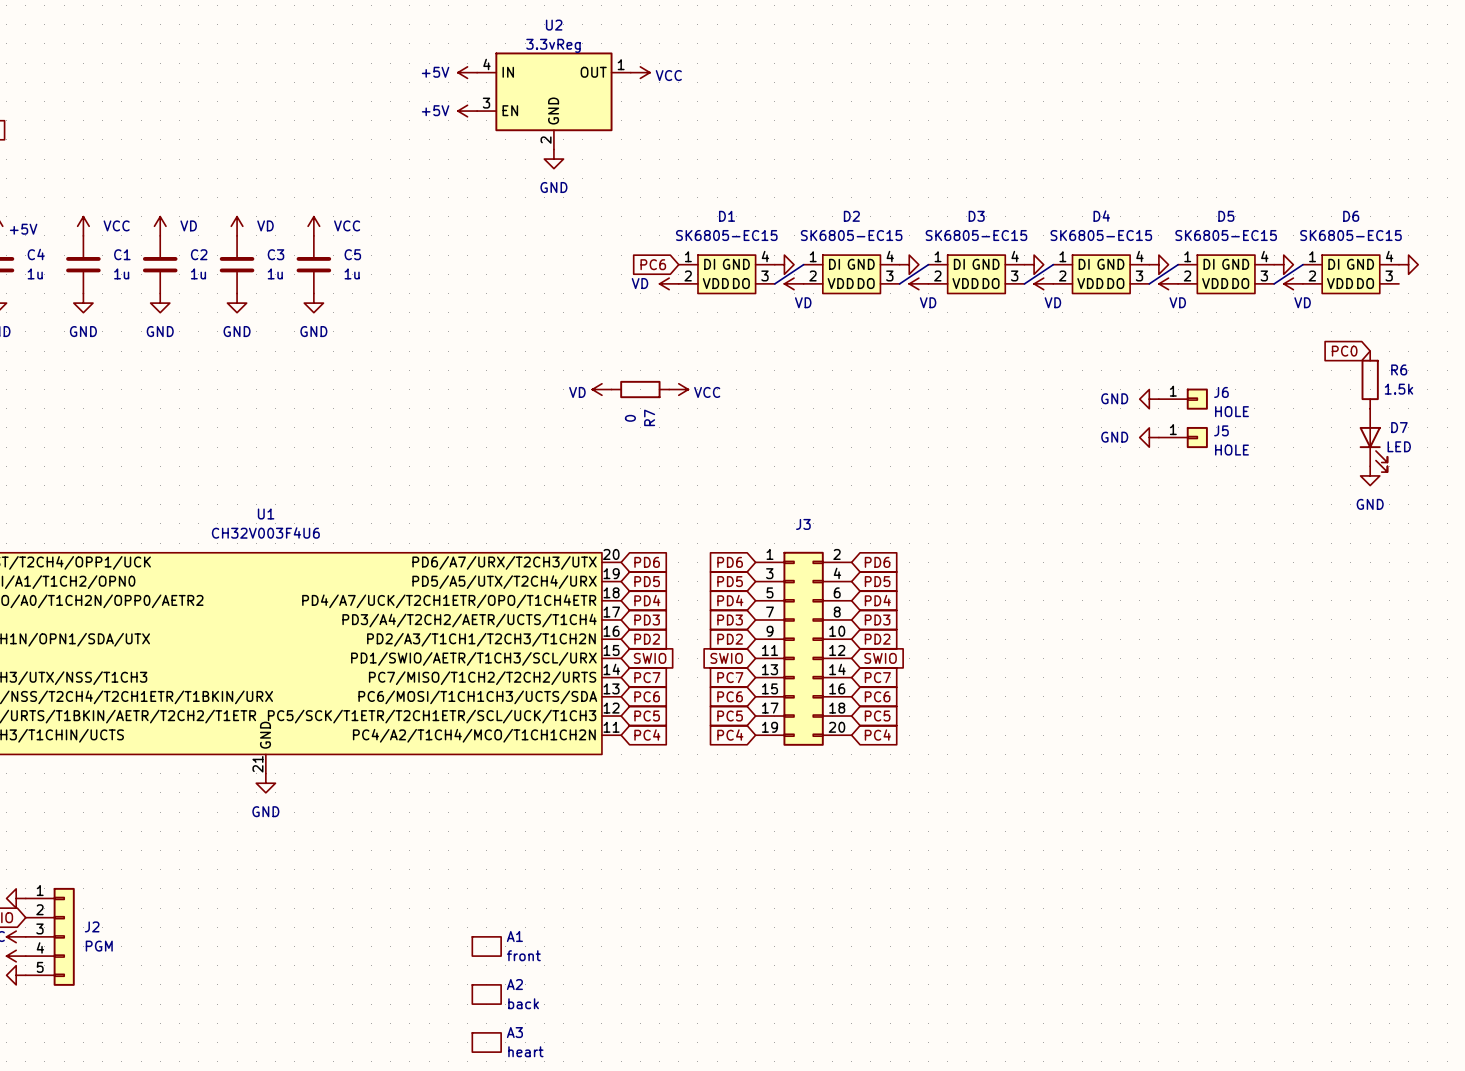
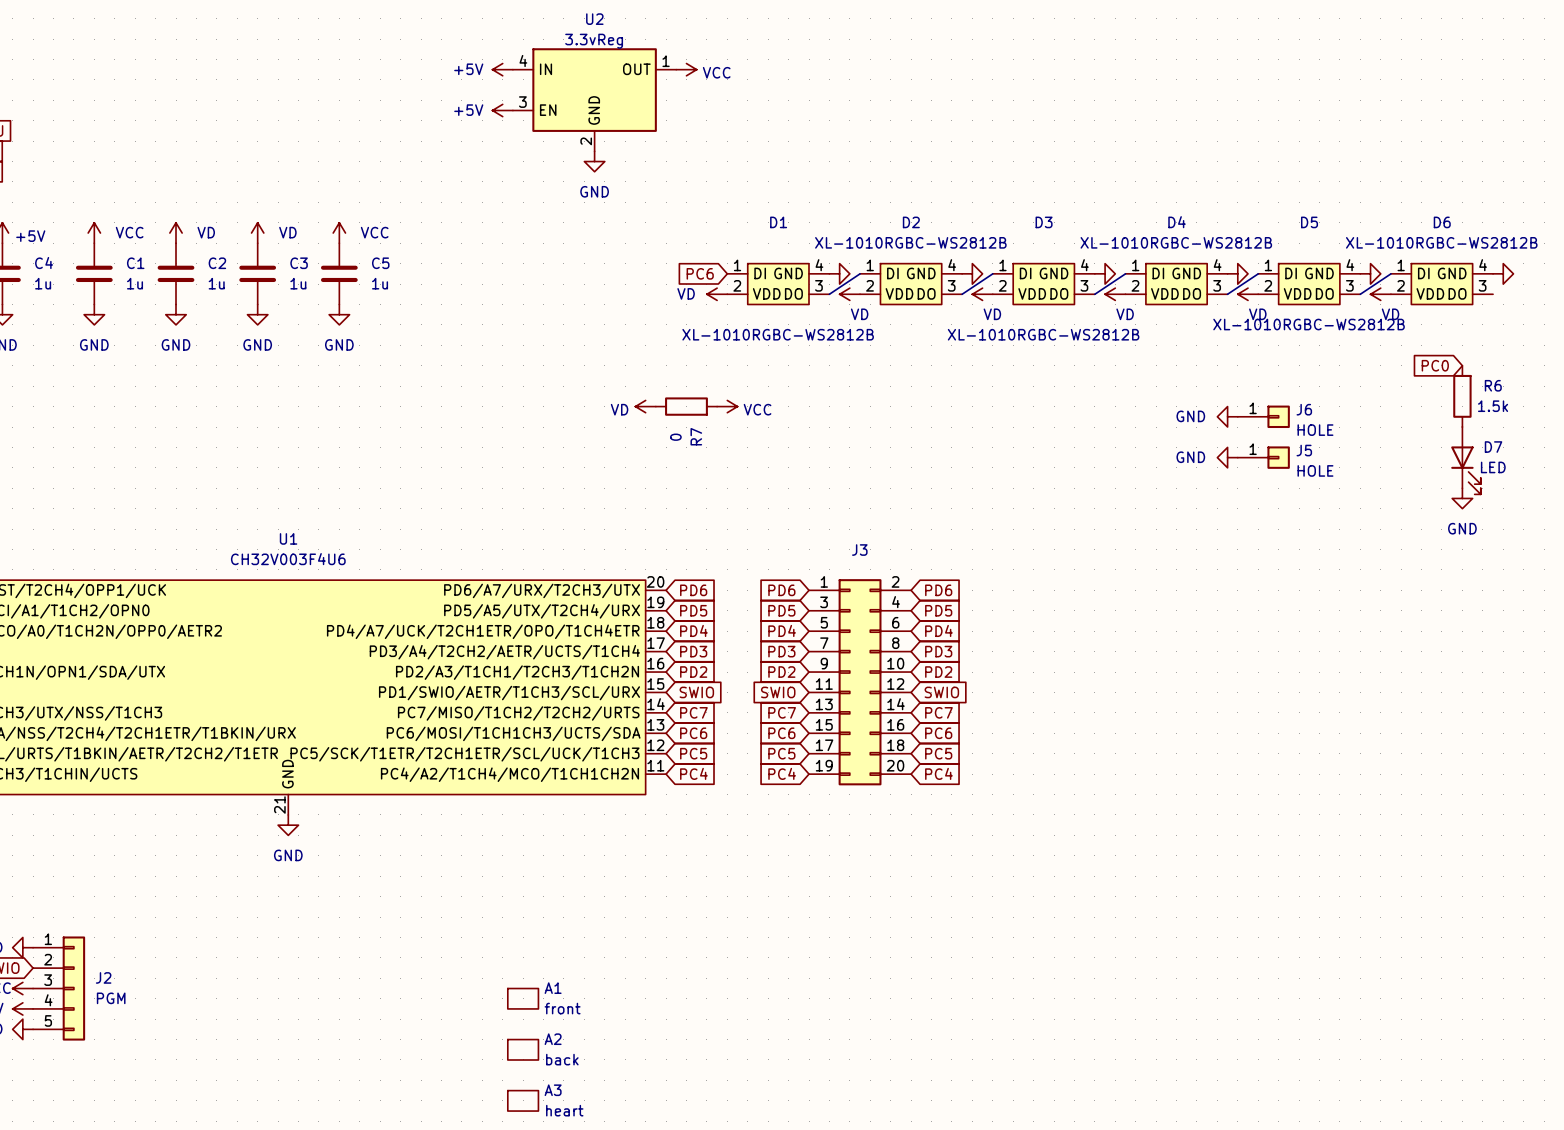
D1 value: SK6805-EC15 (726, 235) -> XL-1010RGBC-WS2812B (778, 334)
D2 value: SK6805-EC15 (851, 235) -> XL-1010RGBC-WS2812B (910, 242)
D3 value: SK6805-EC15 (976, 235) -> XL-1010RGBC-WS2812B (1043, 334)
D4 value: SK6805-EC15 (1101, 235) -> XL-1010RGBC-WS2812B (1176, 242)
D5 value: SK6805-EC15 (1226, 235) -> XL-1010RGBC-WS2812B (1309, 324)
D6 value: SK6805-EC15 (1350, 235) -> XL-1010RGBC-WS2812B (1441, 242)

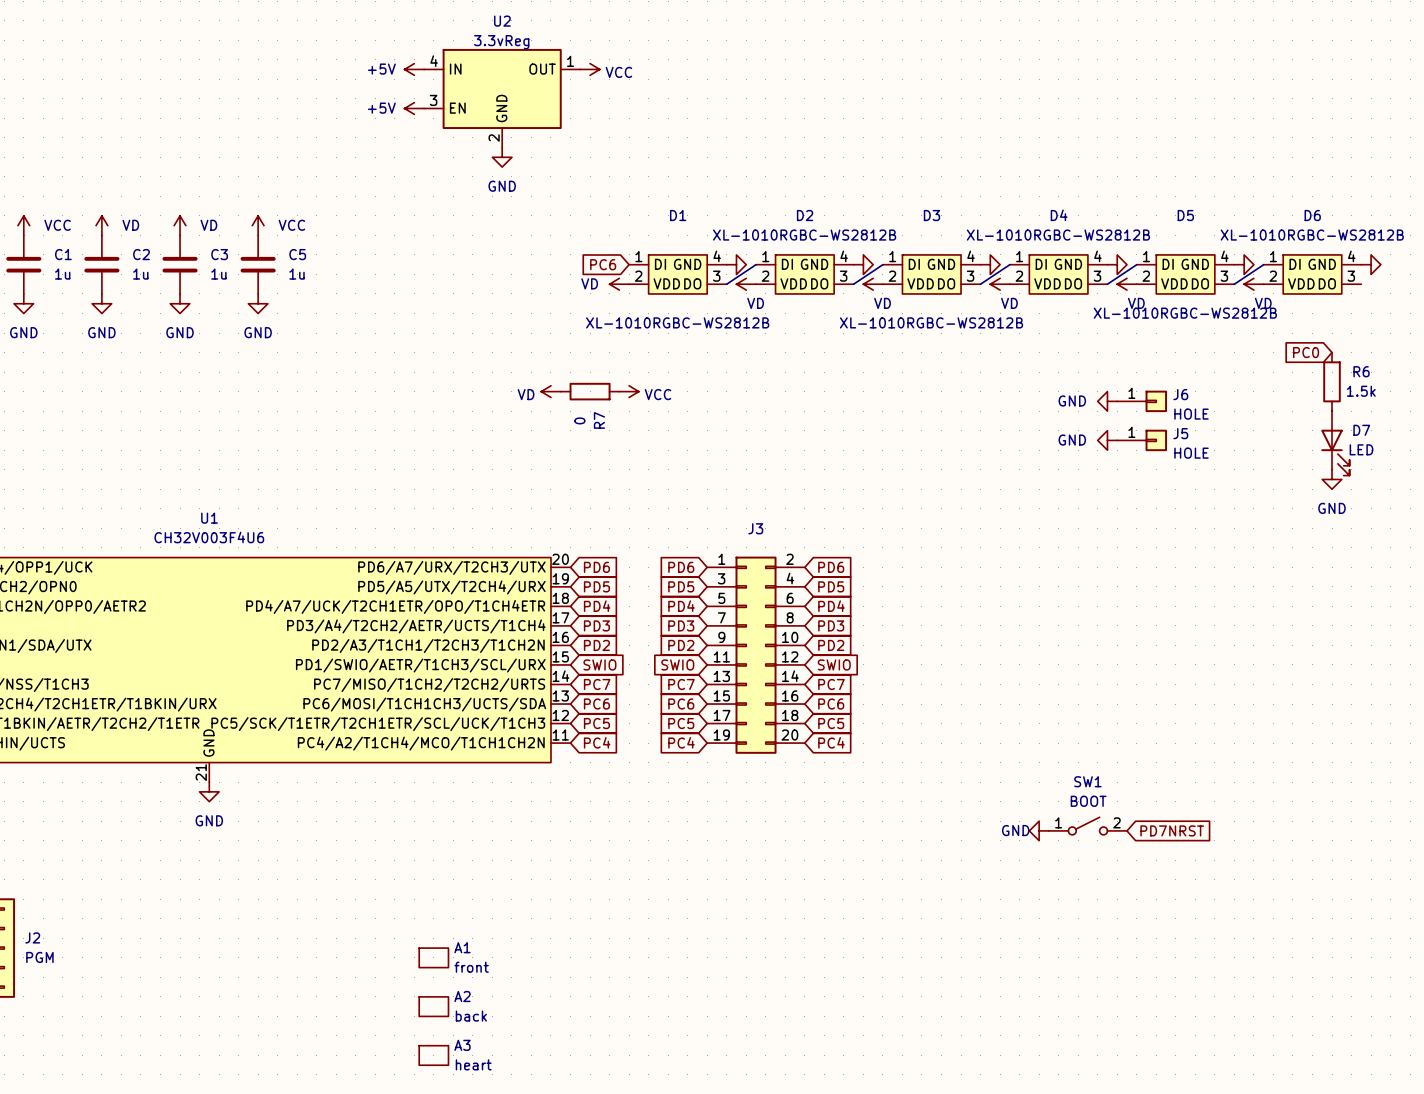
SW1: none -> BOOT (1087, 826)
power symbol: none -> GND (1039, 830)
global label: none -> PD7NRST (1172, 830)

